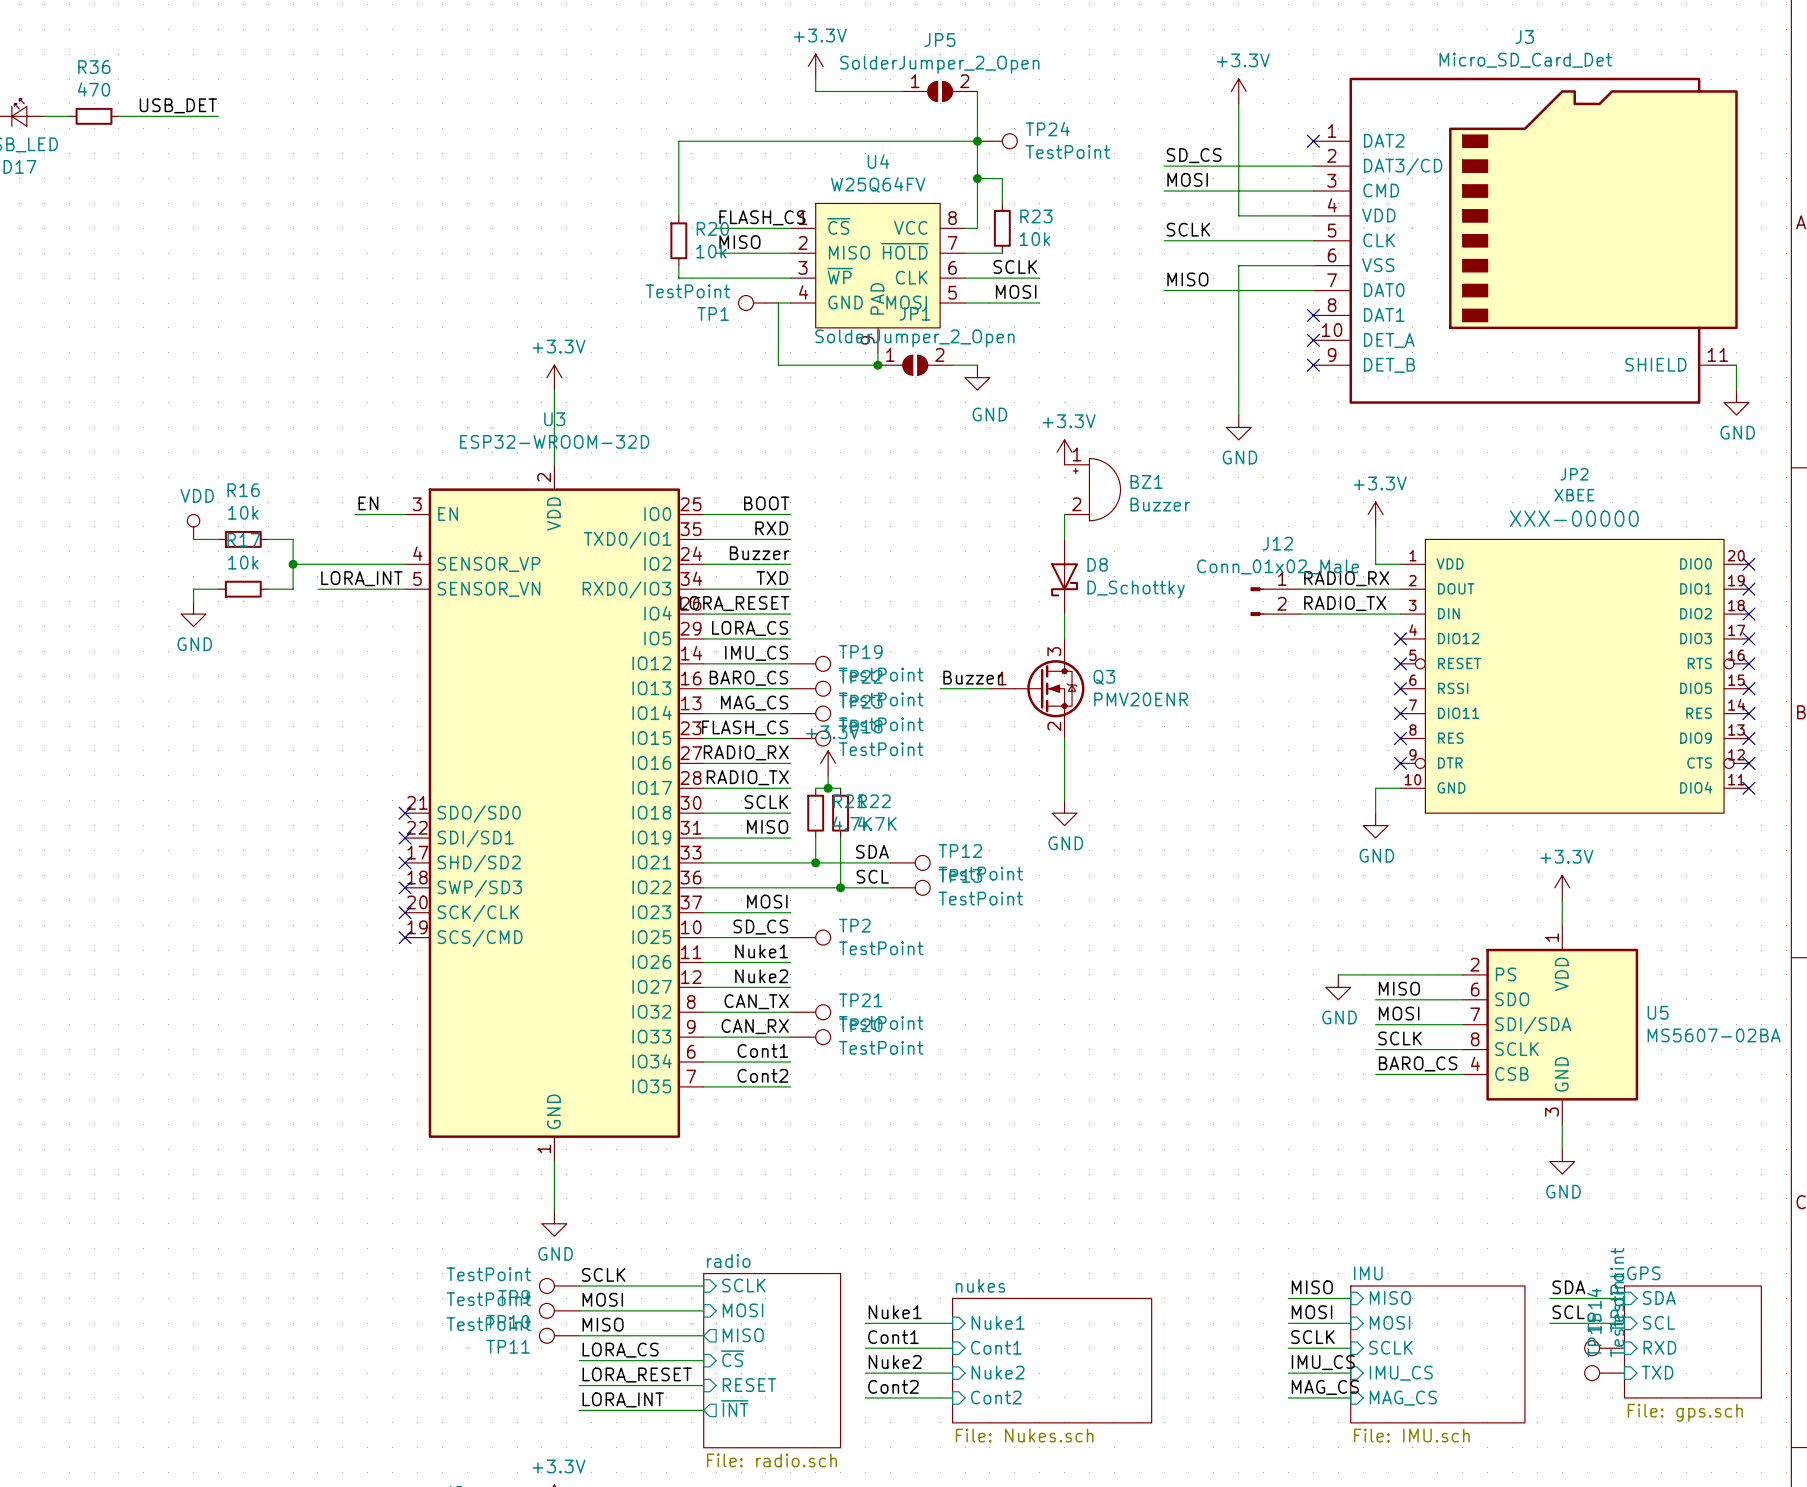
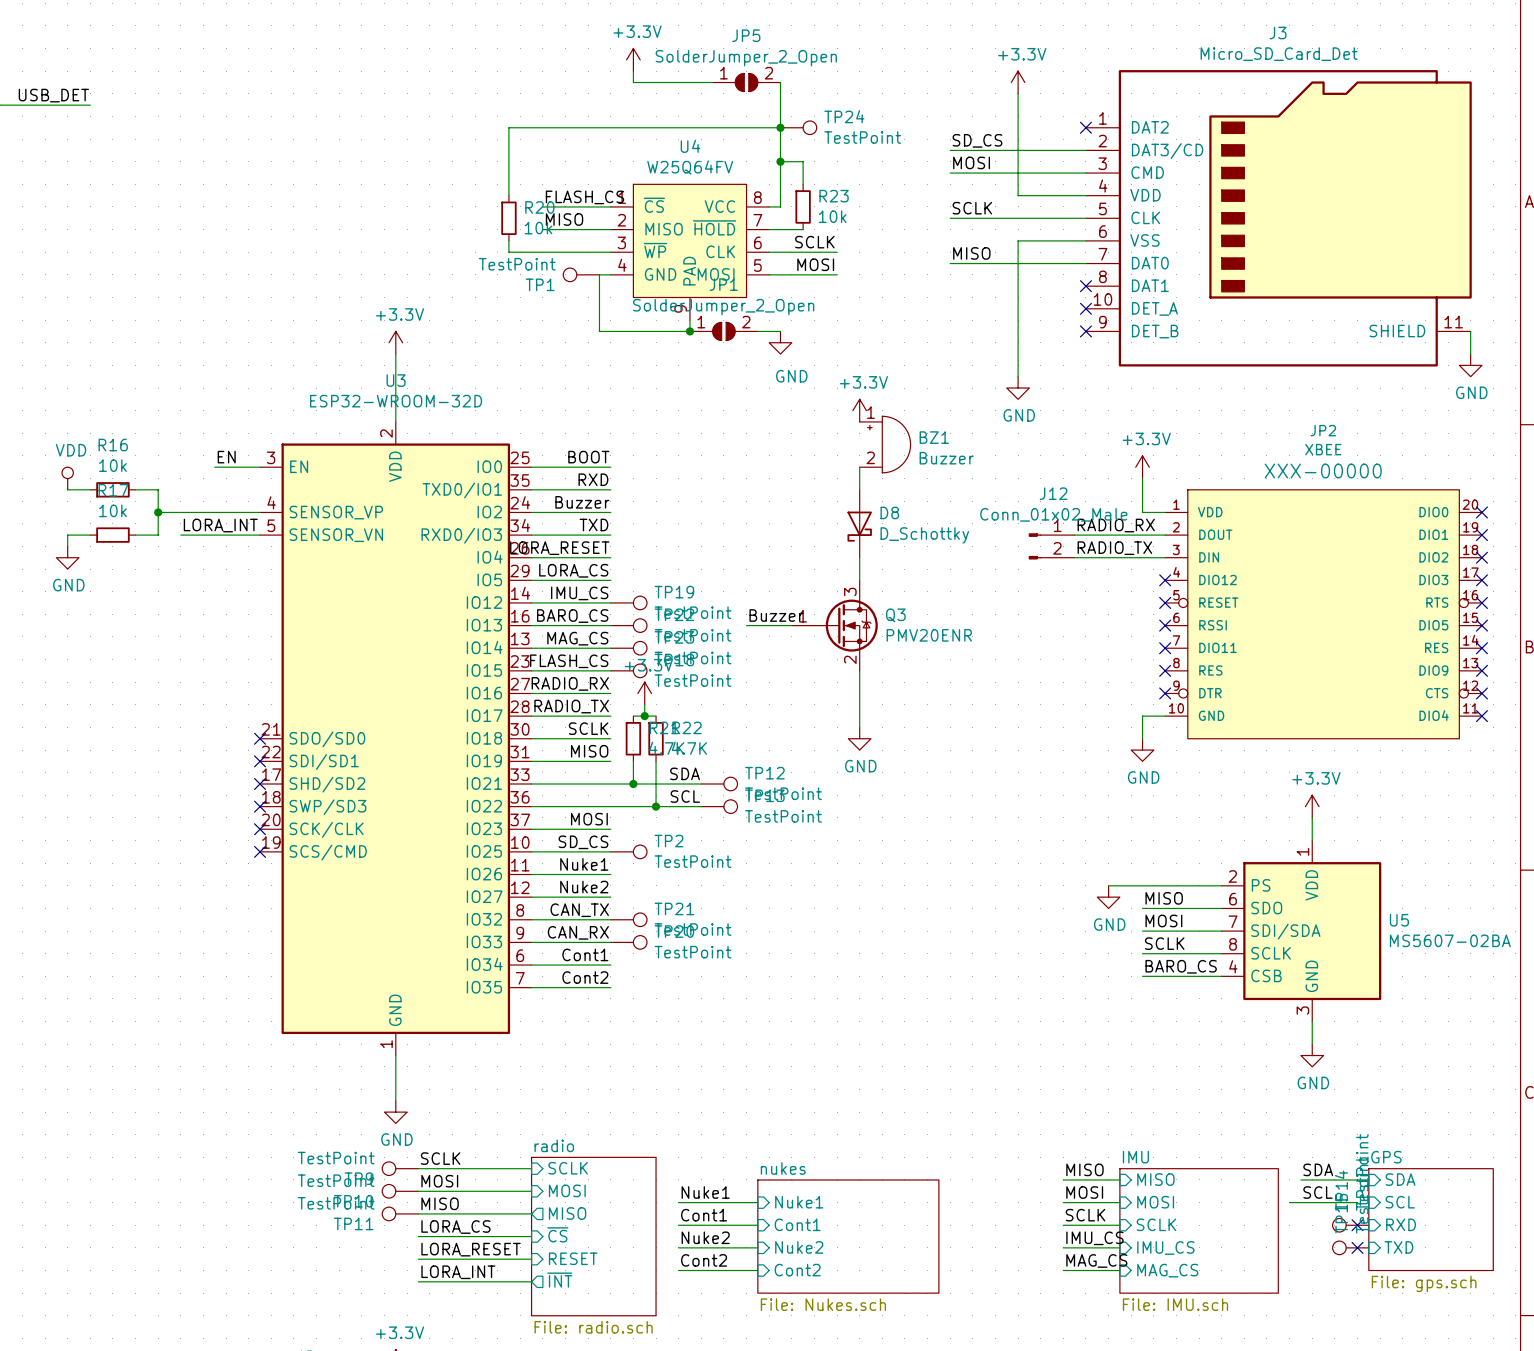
wire: (1612, 1323) (1624, 1323) -> (1289, 1202) (1300, 1202)
no-connect mark: none -> (1357, 1225)
no-connect mark: none -> (1357, 1247)

